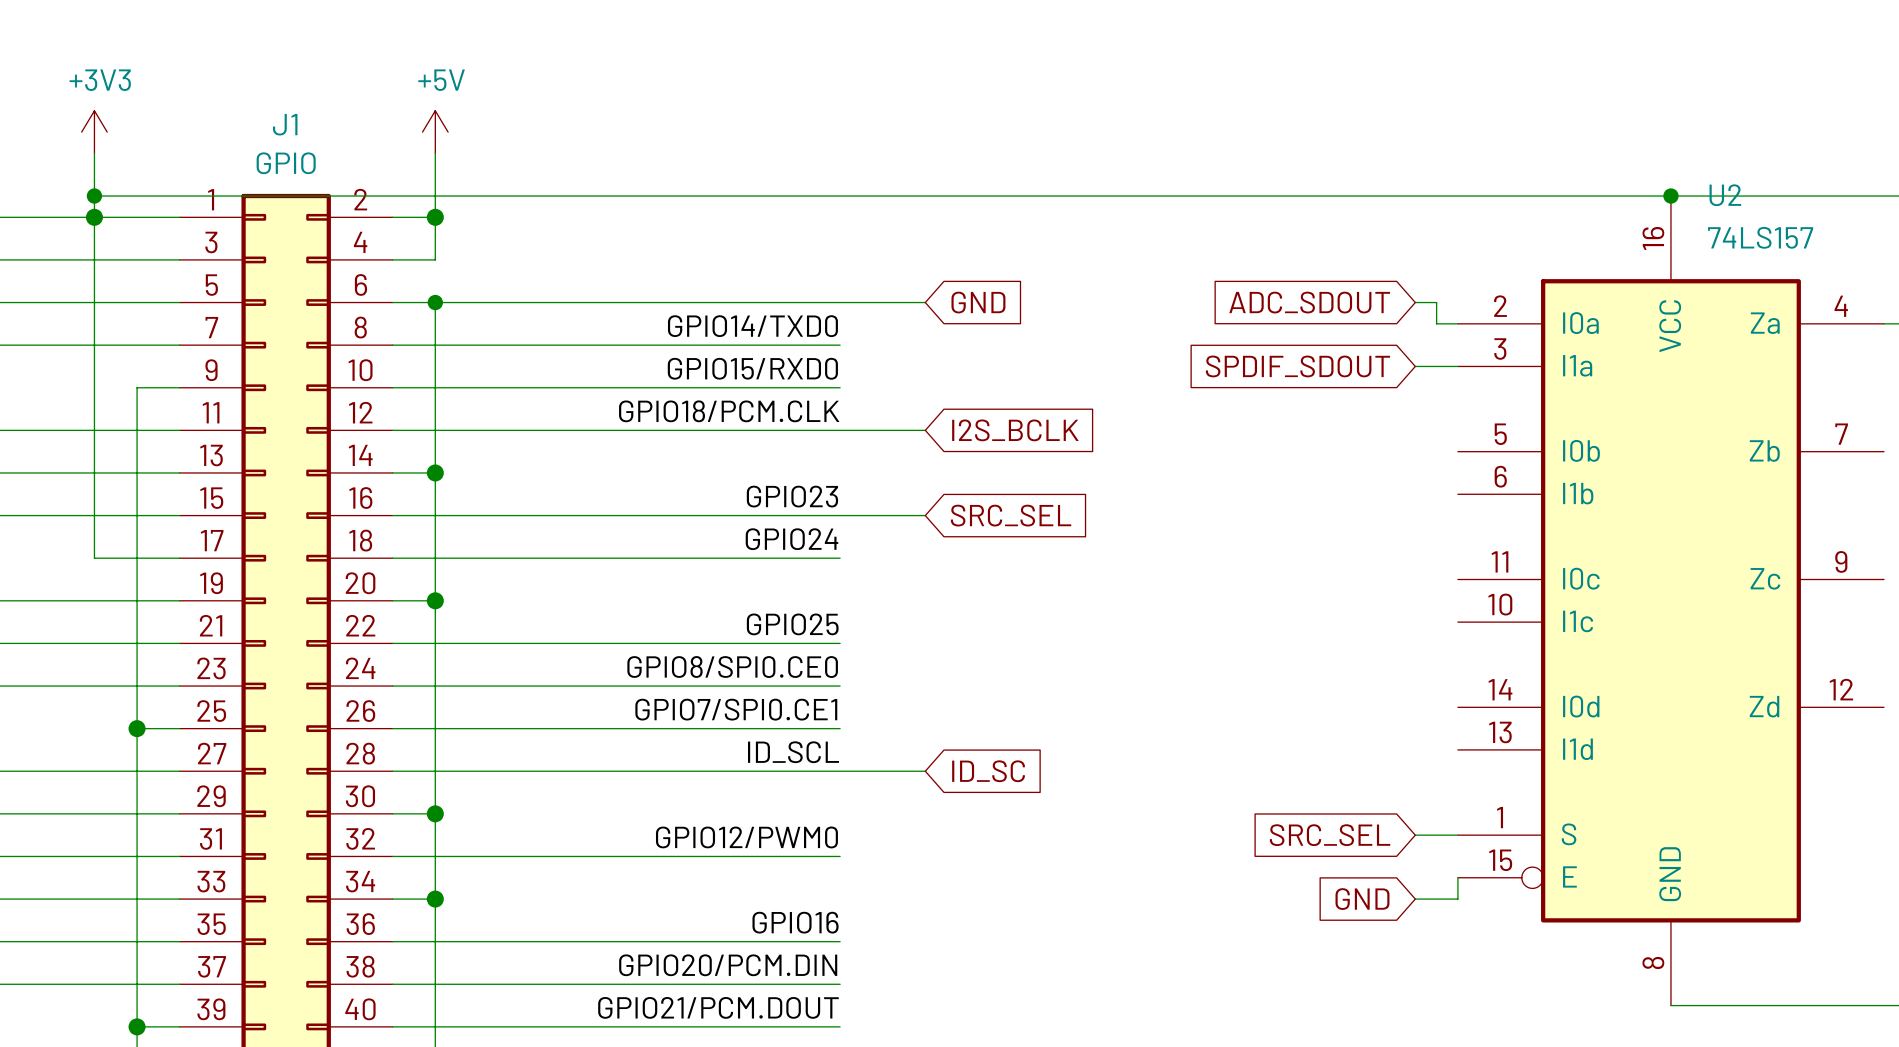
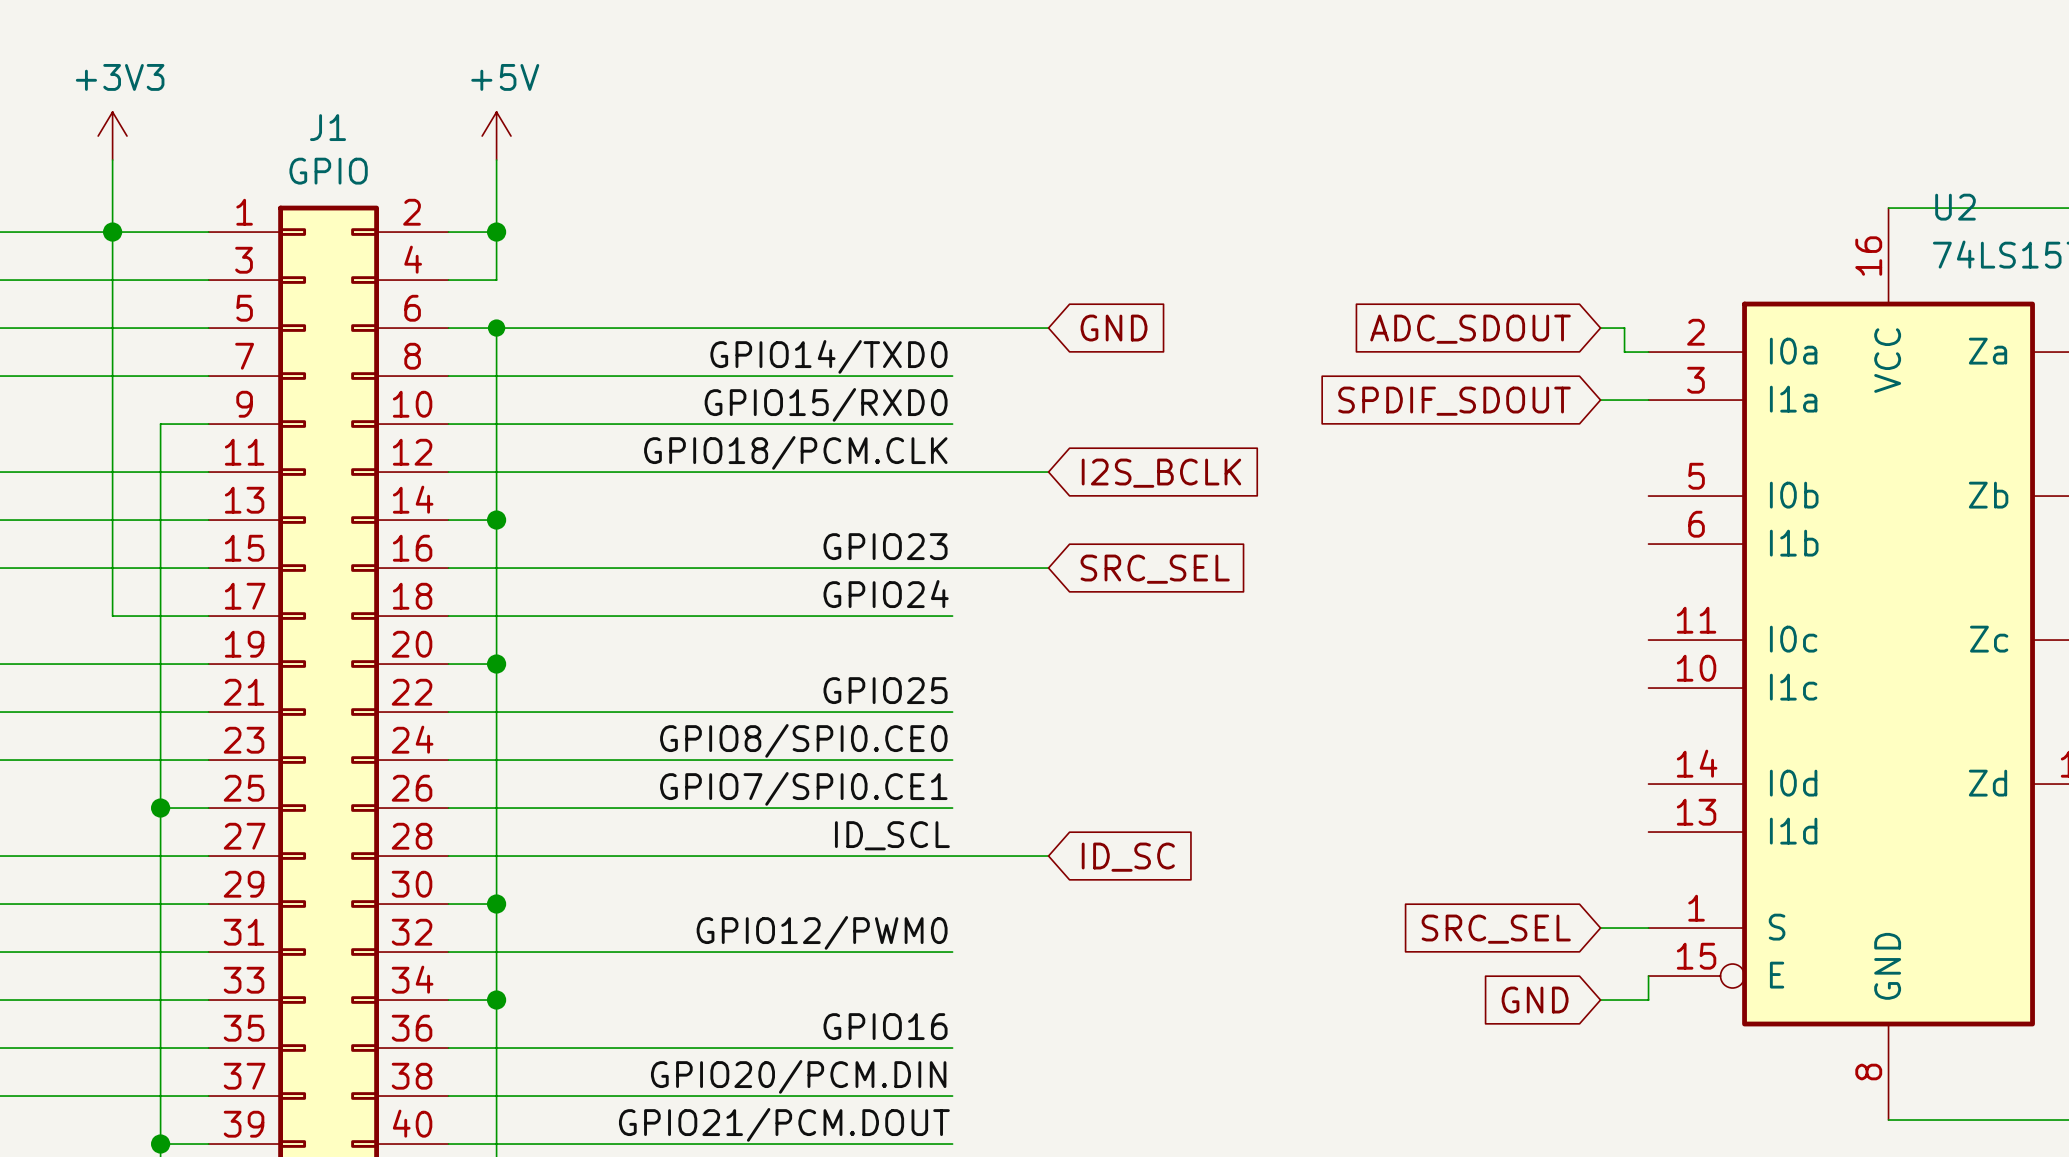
wire: (94, 196) (1670, 196) -> none
junction: (94, 196) -> none
junction: (1670, 196) -> none

